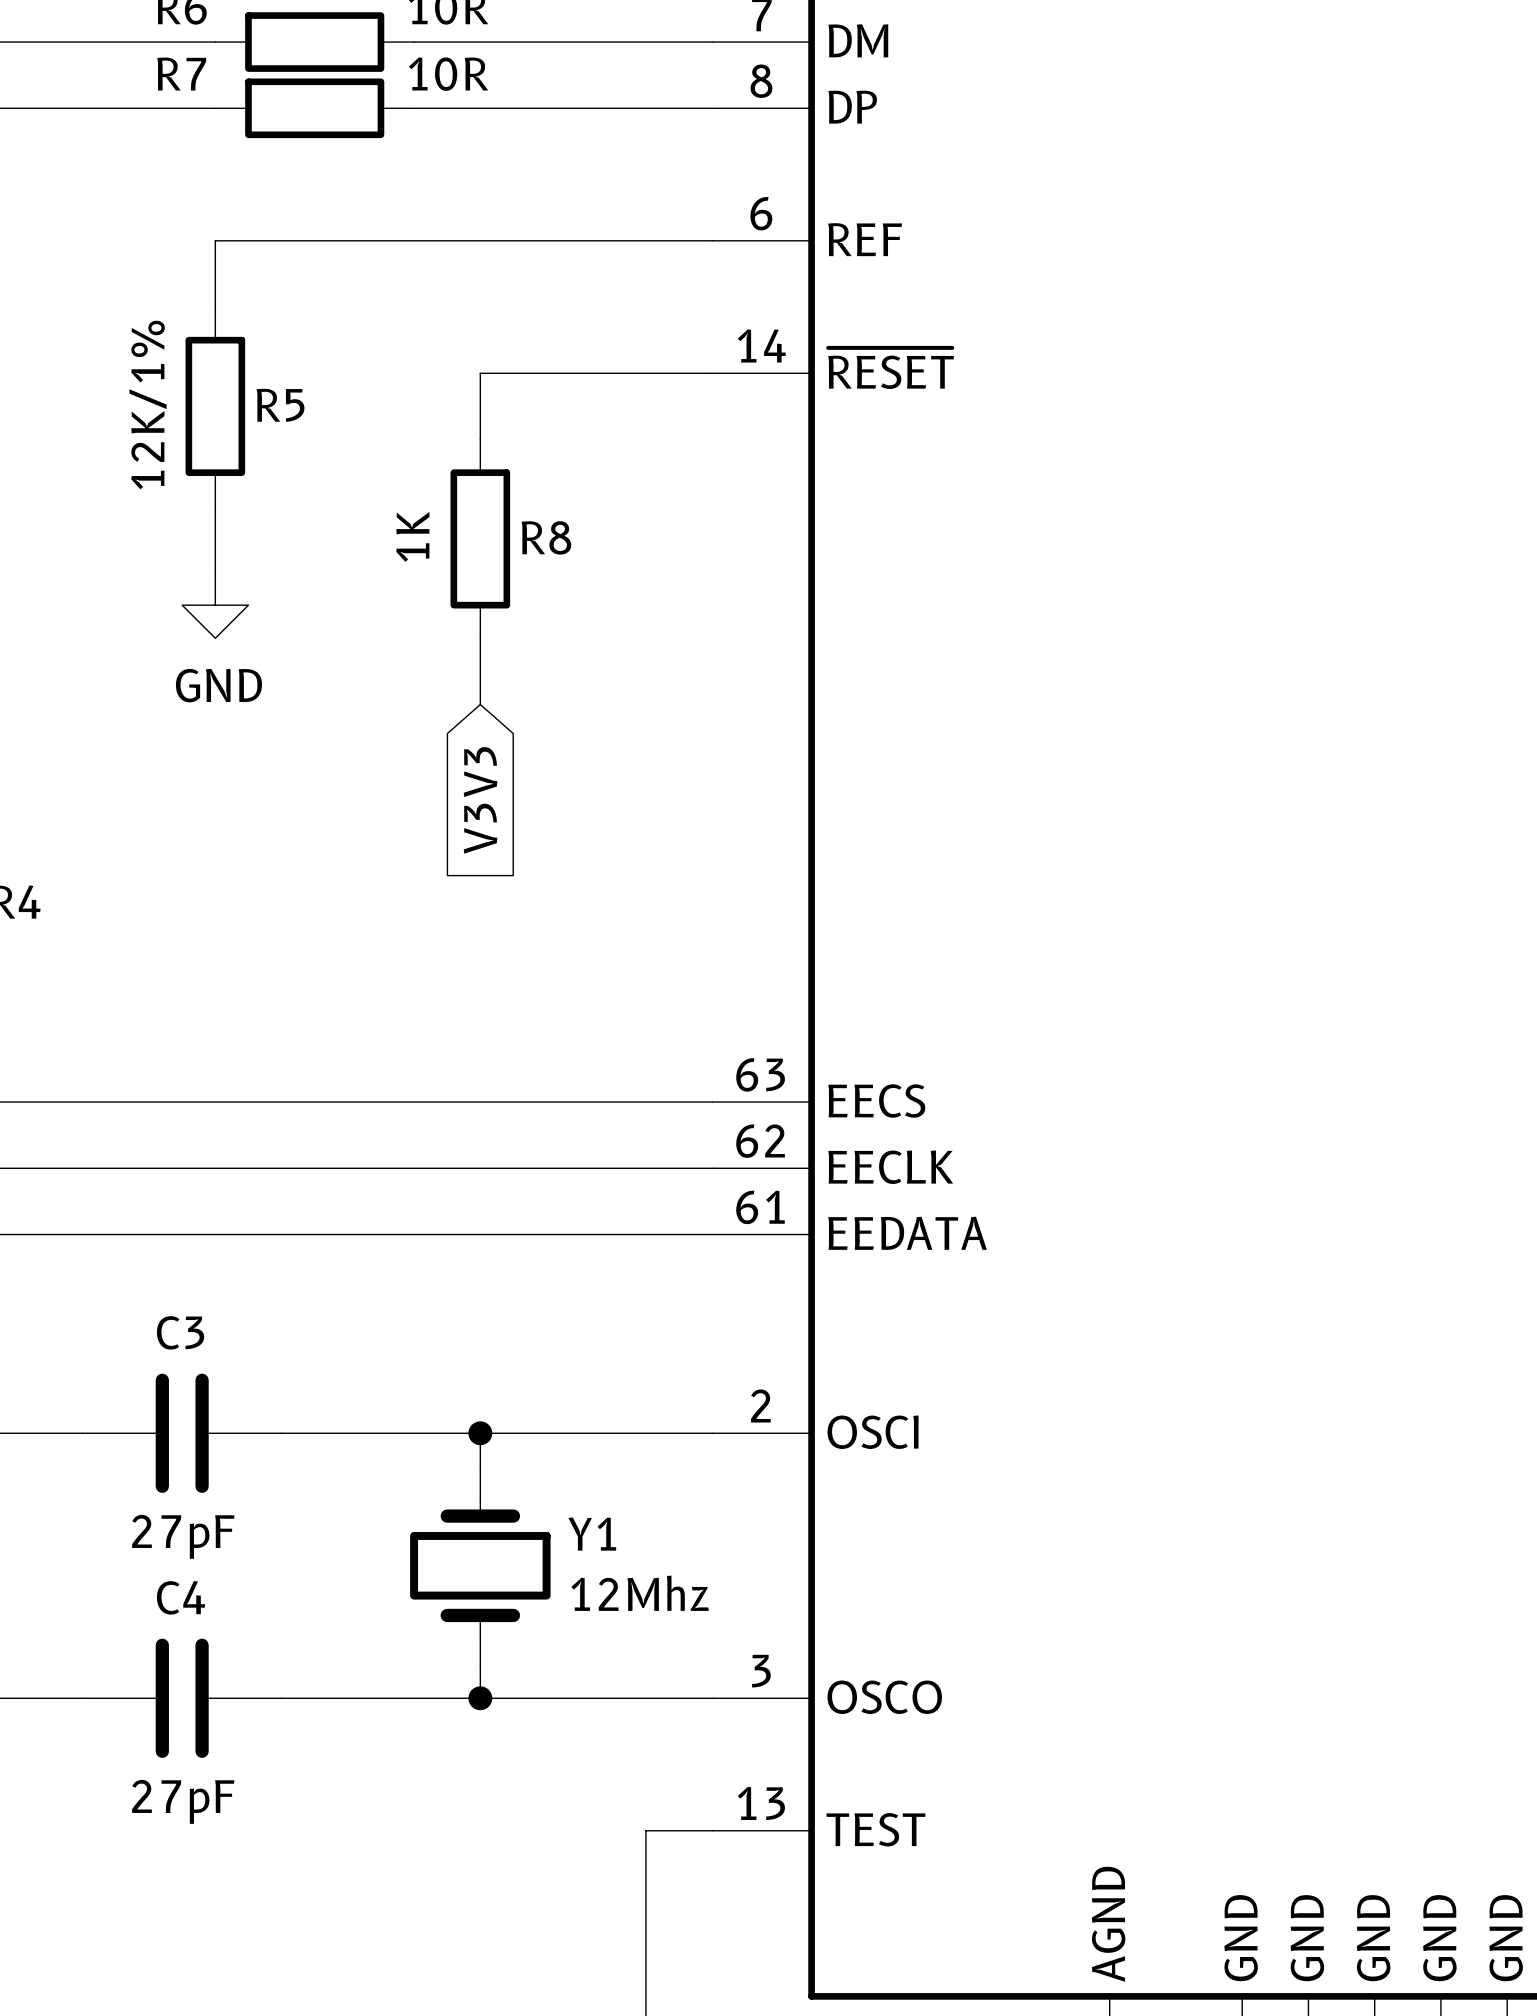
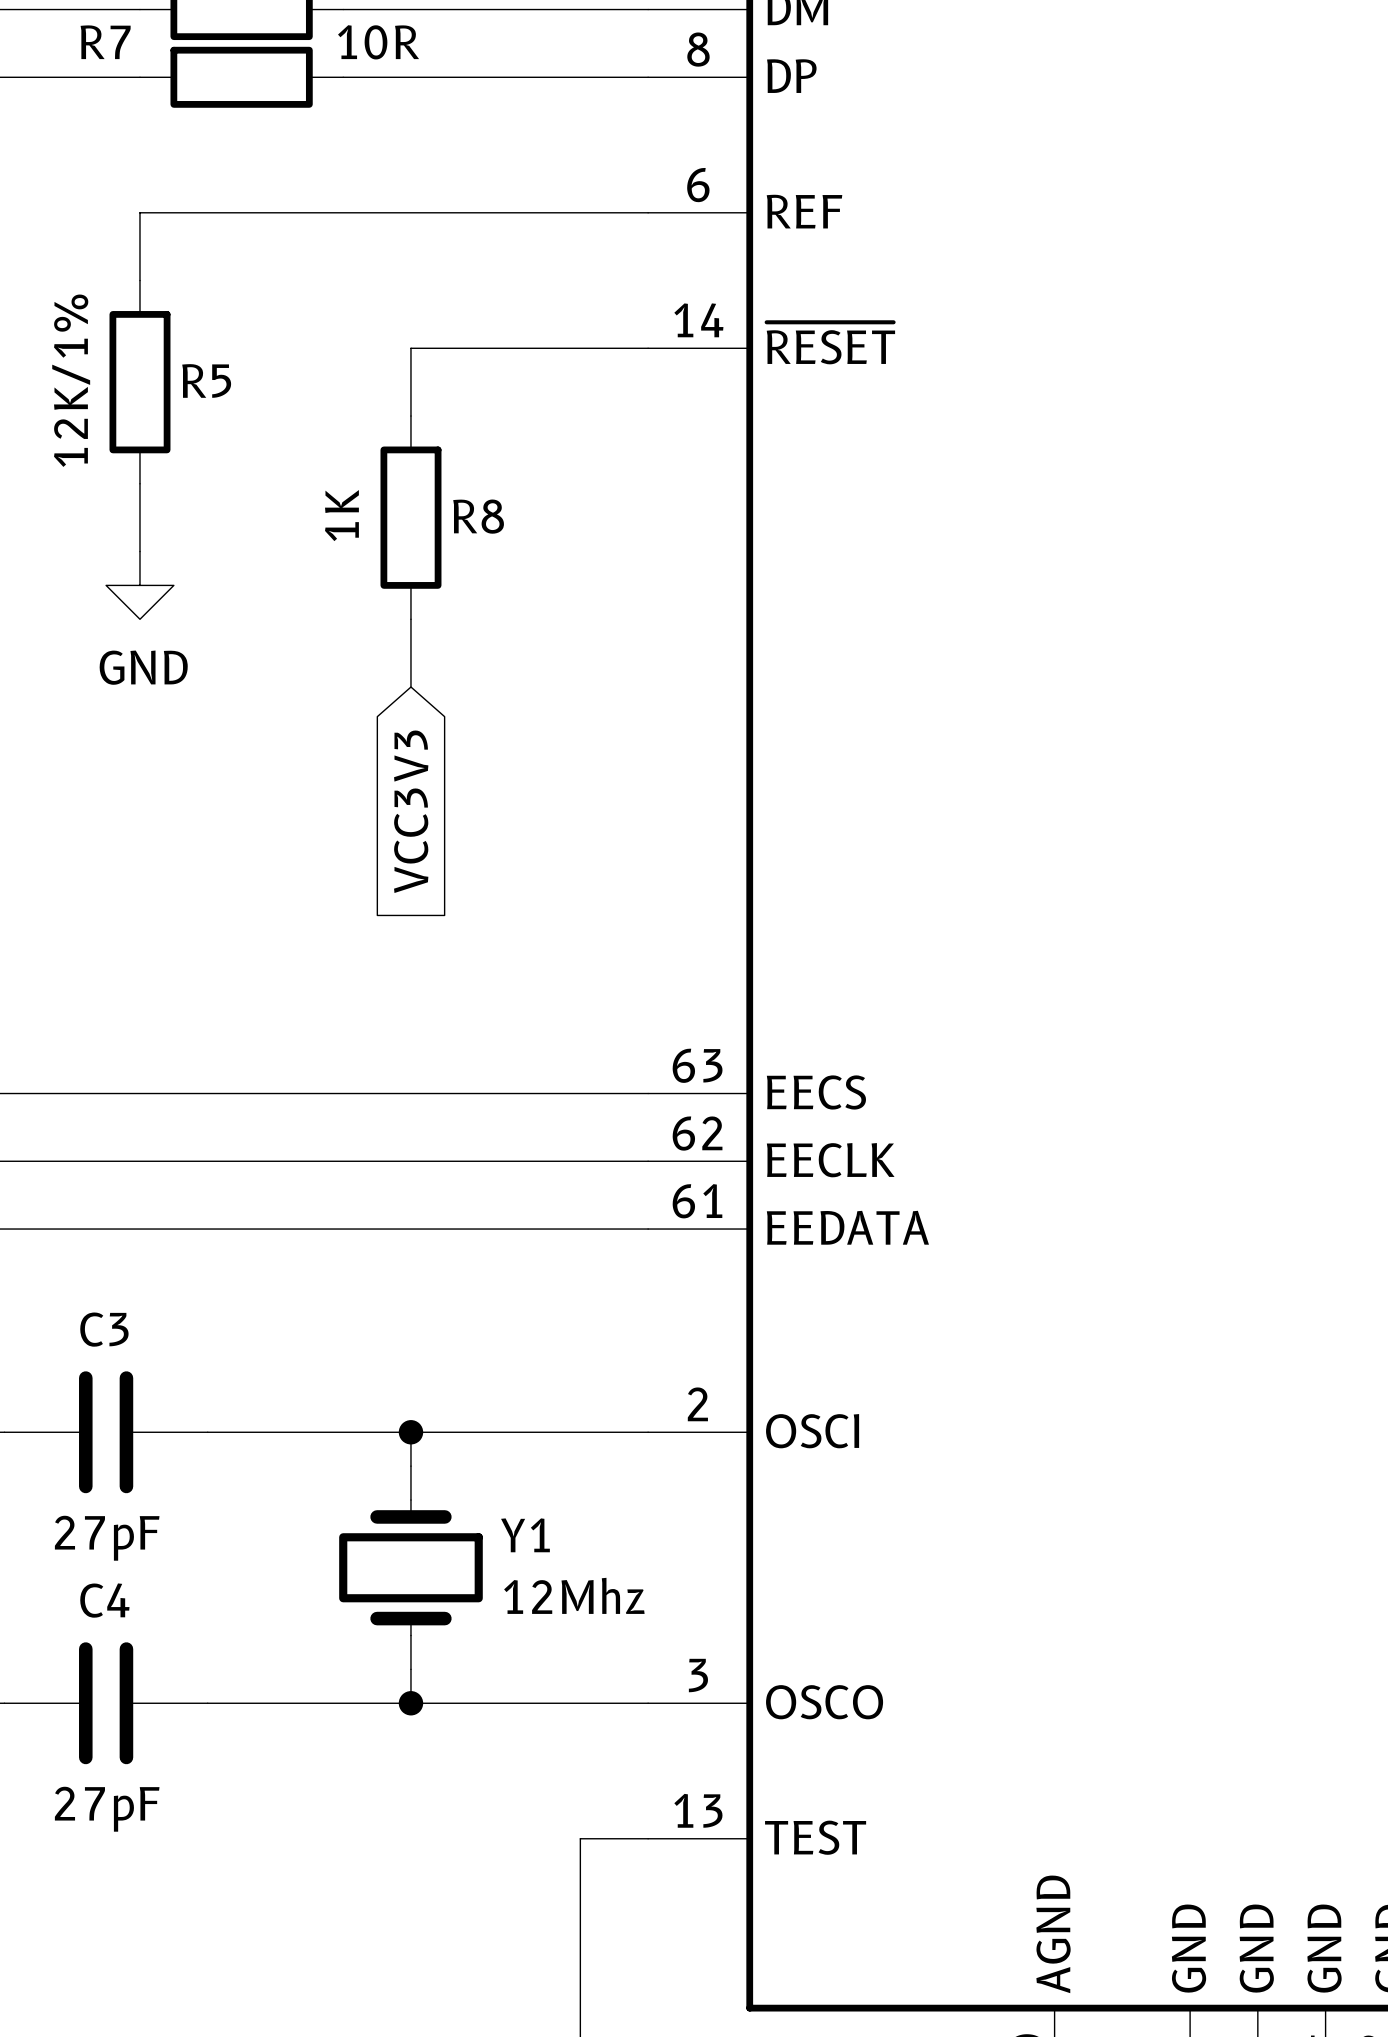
global label: V3V3 (480, 800) -> VCC3V3 (411, 811)

